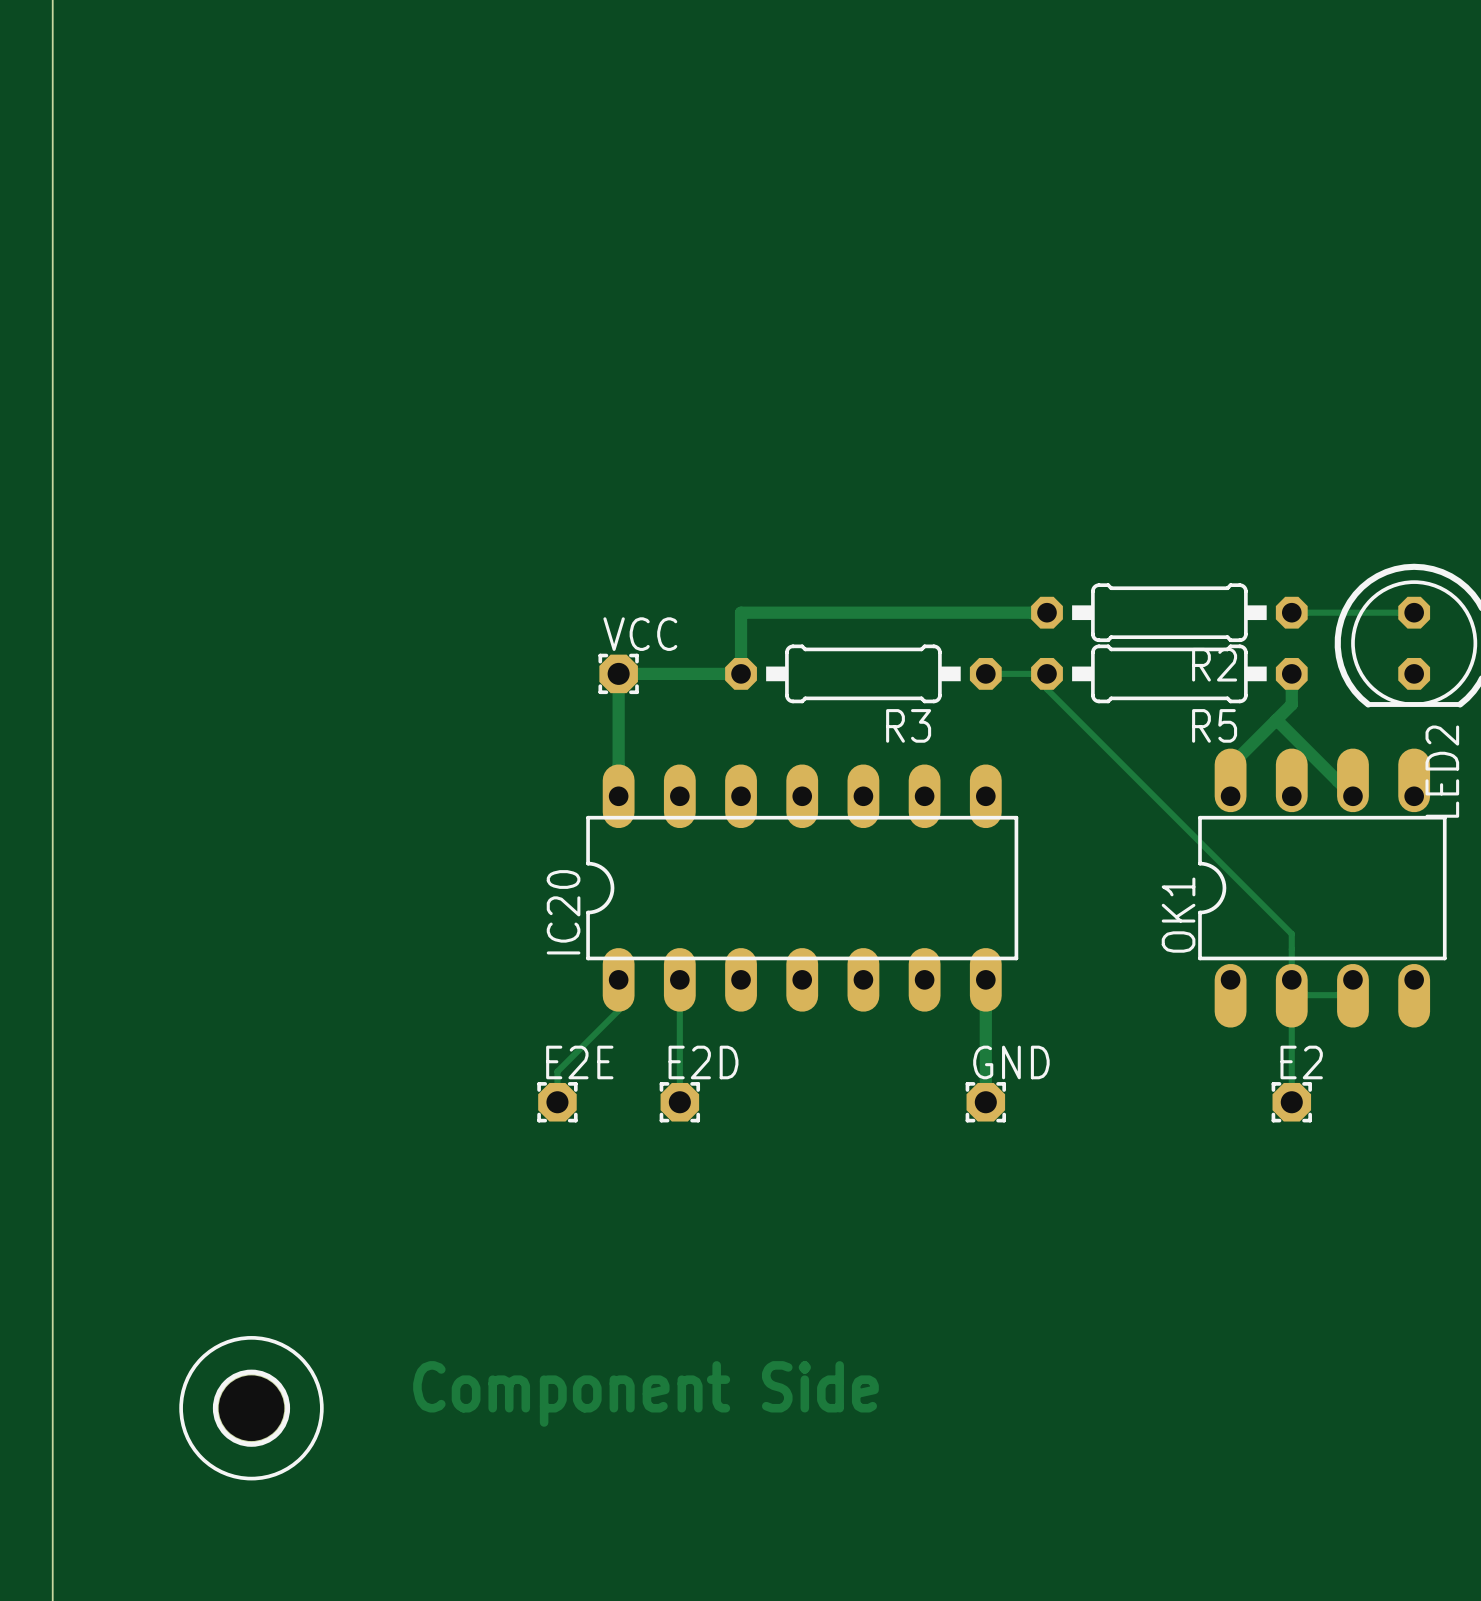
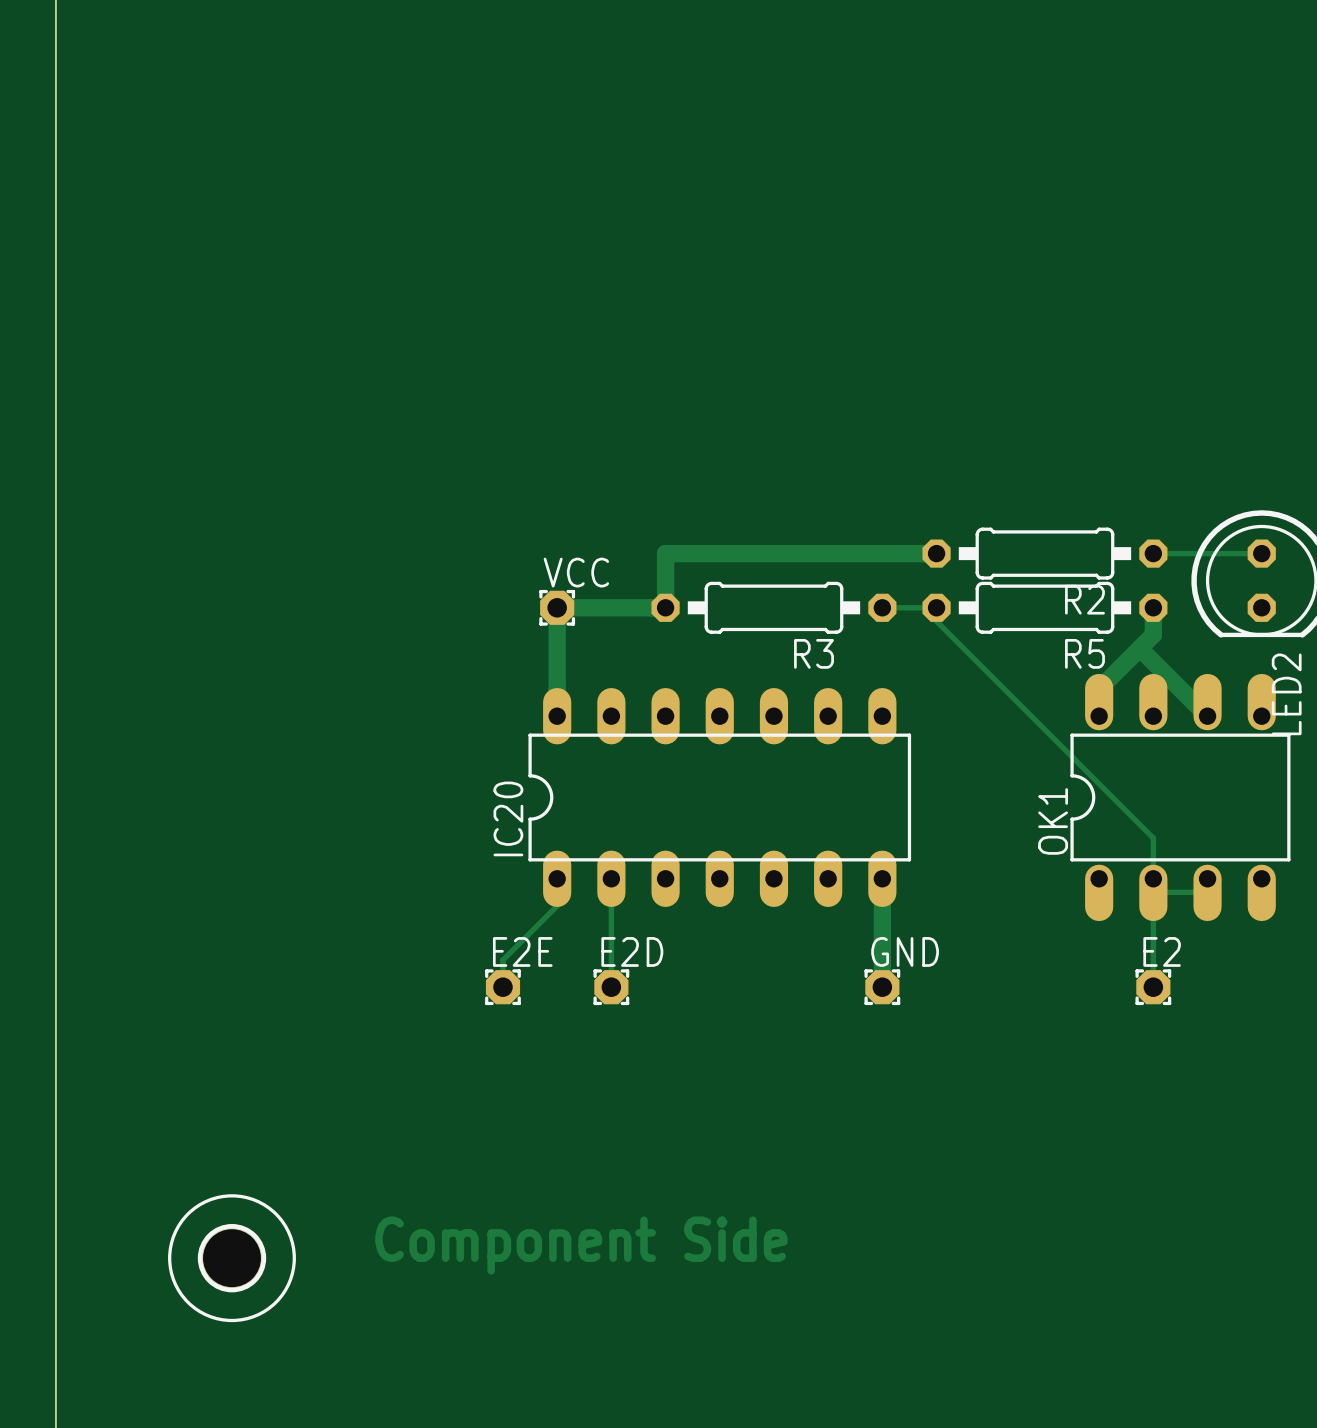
track width: thin (1047, 612) (741, 612) (741, 673) (618, 673) (618, 796) -> thick (936, 553) (665, 553) (665, 607) (557, 607) (557, 716)
track width: thin (1291, 673) (1291, 704) (1230, 765) (1230, 796) -> thick (1153, 607) (1153, 634) (1099, 689) (1099, 716)
track width: thin (1276, 719) (1352, 796) -> thick (1139, 648) (1207, 716)
track width: thin (985, 979) (985, 1102) -> thick (882, 878) (882, 987)

